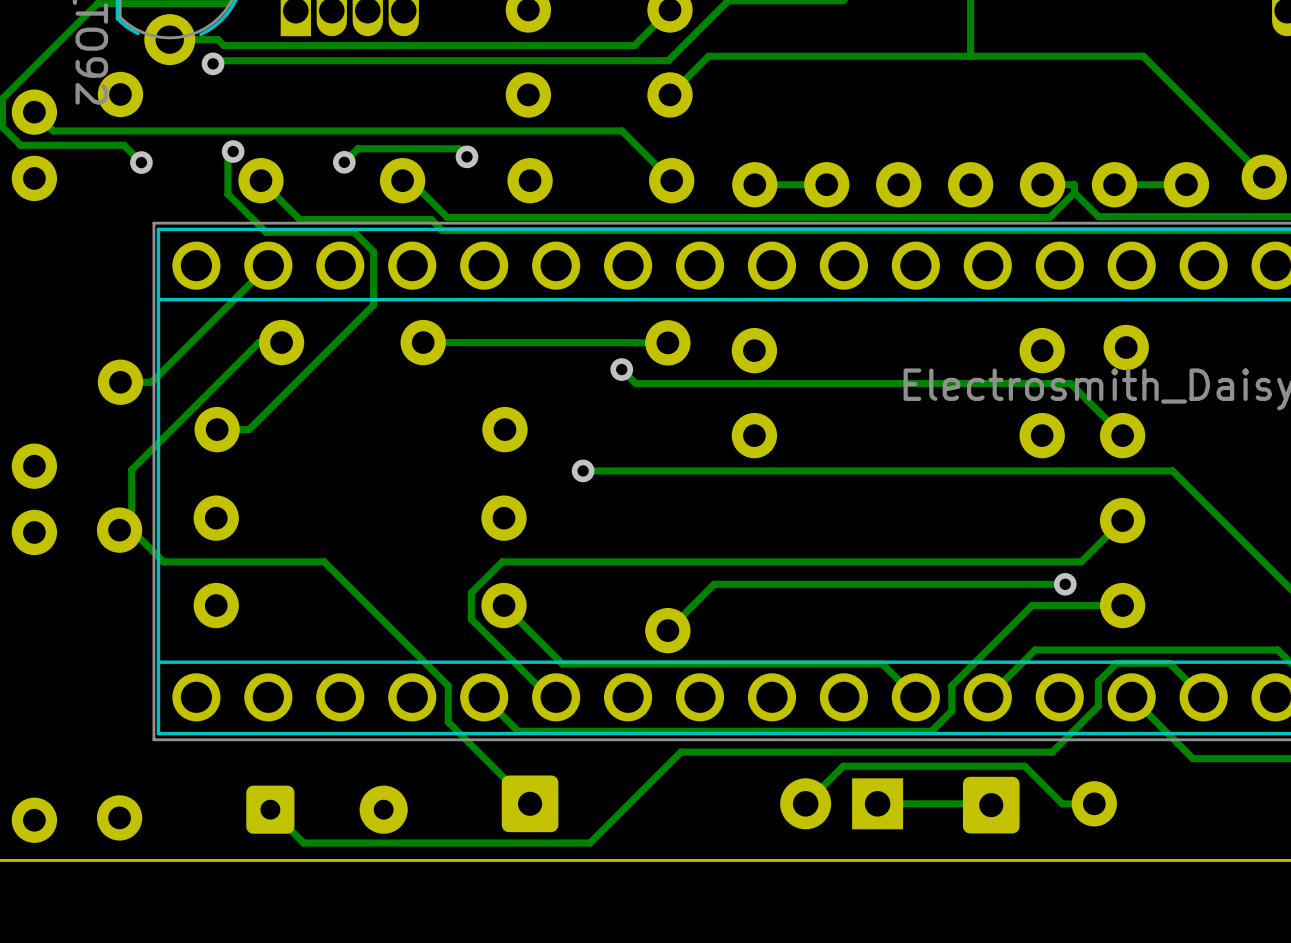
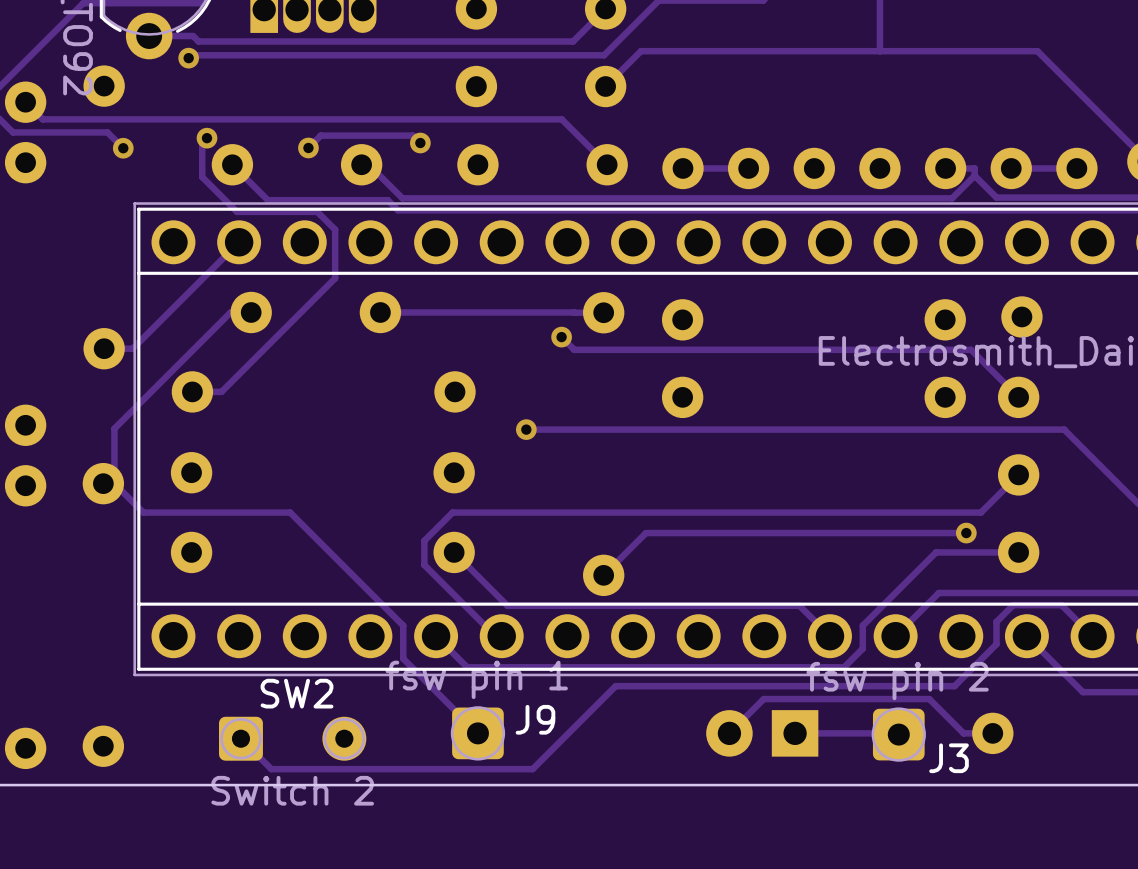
J9 side: top (530, 803) -> bottom (477, 733)
J3 side: top (991, 805) -> bottom (898, 734)
SW2 side: top (327, 809) -> bottom (292, 738)

